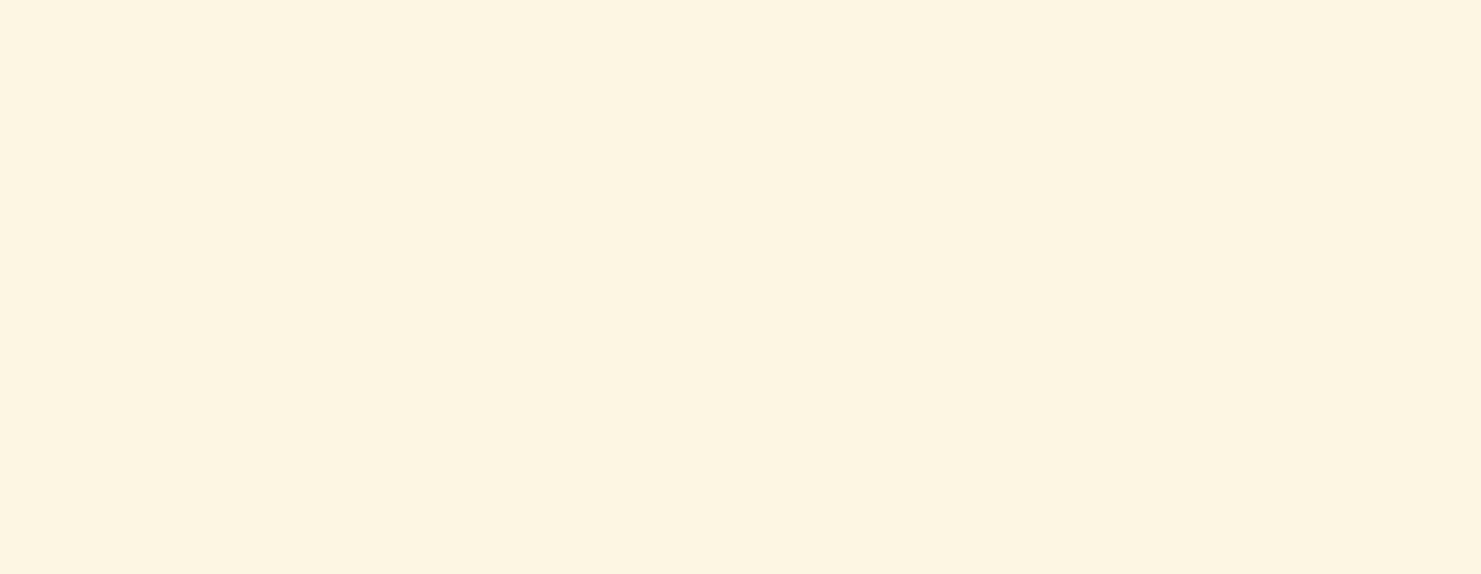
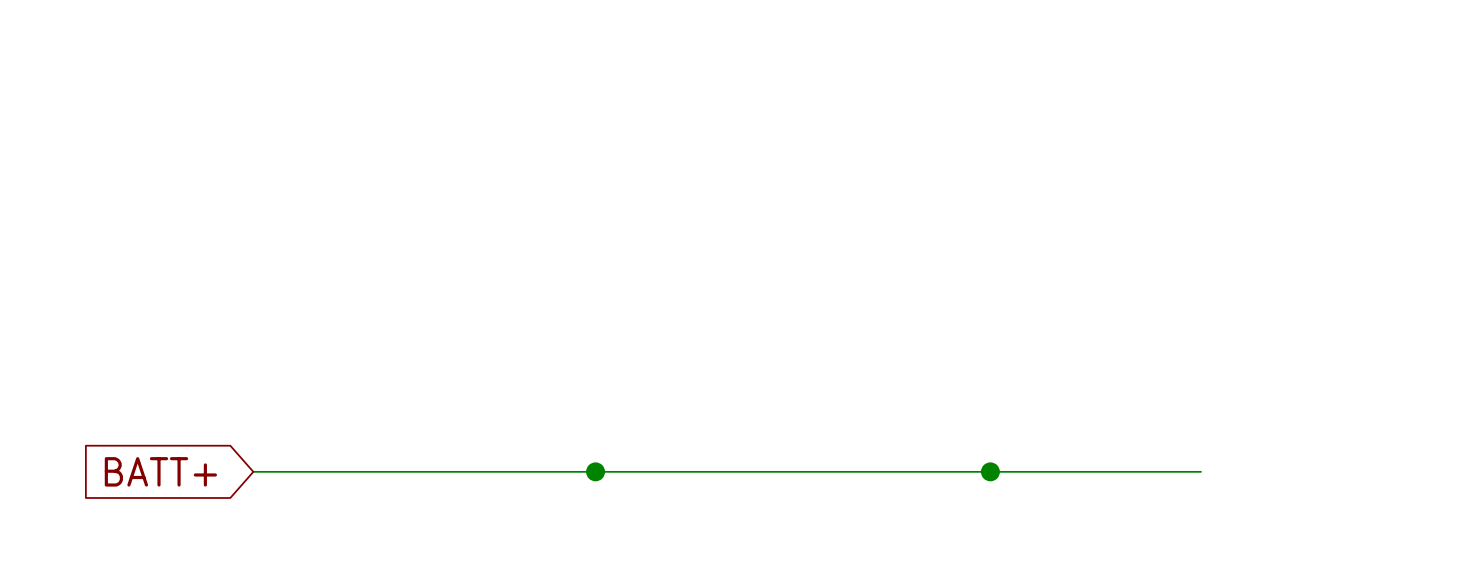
global label: none -> BATT+ (160, 471)
wire: none -> (253, 471) (1201, 471)
junction: none -> (595, 471)
junction: none -> (990, 471)

